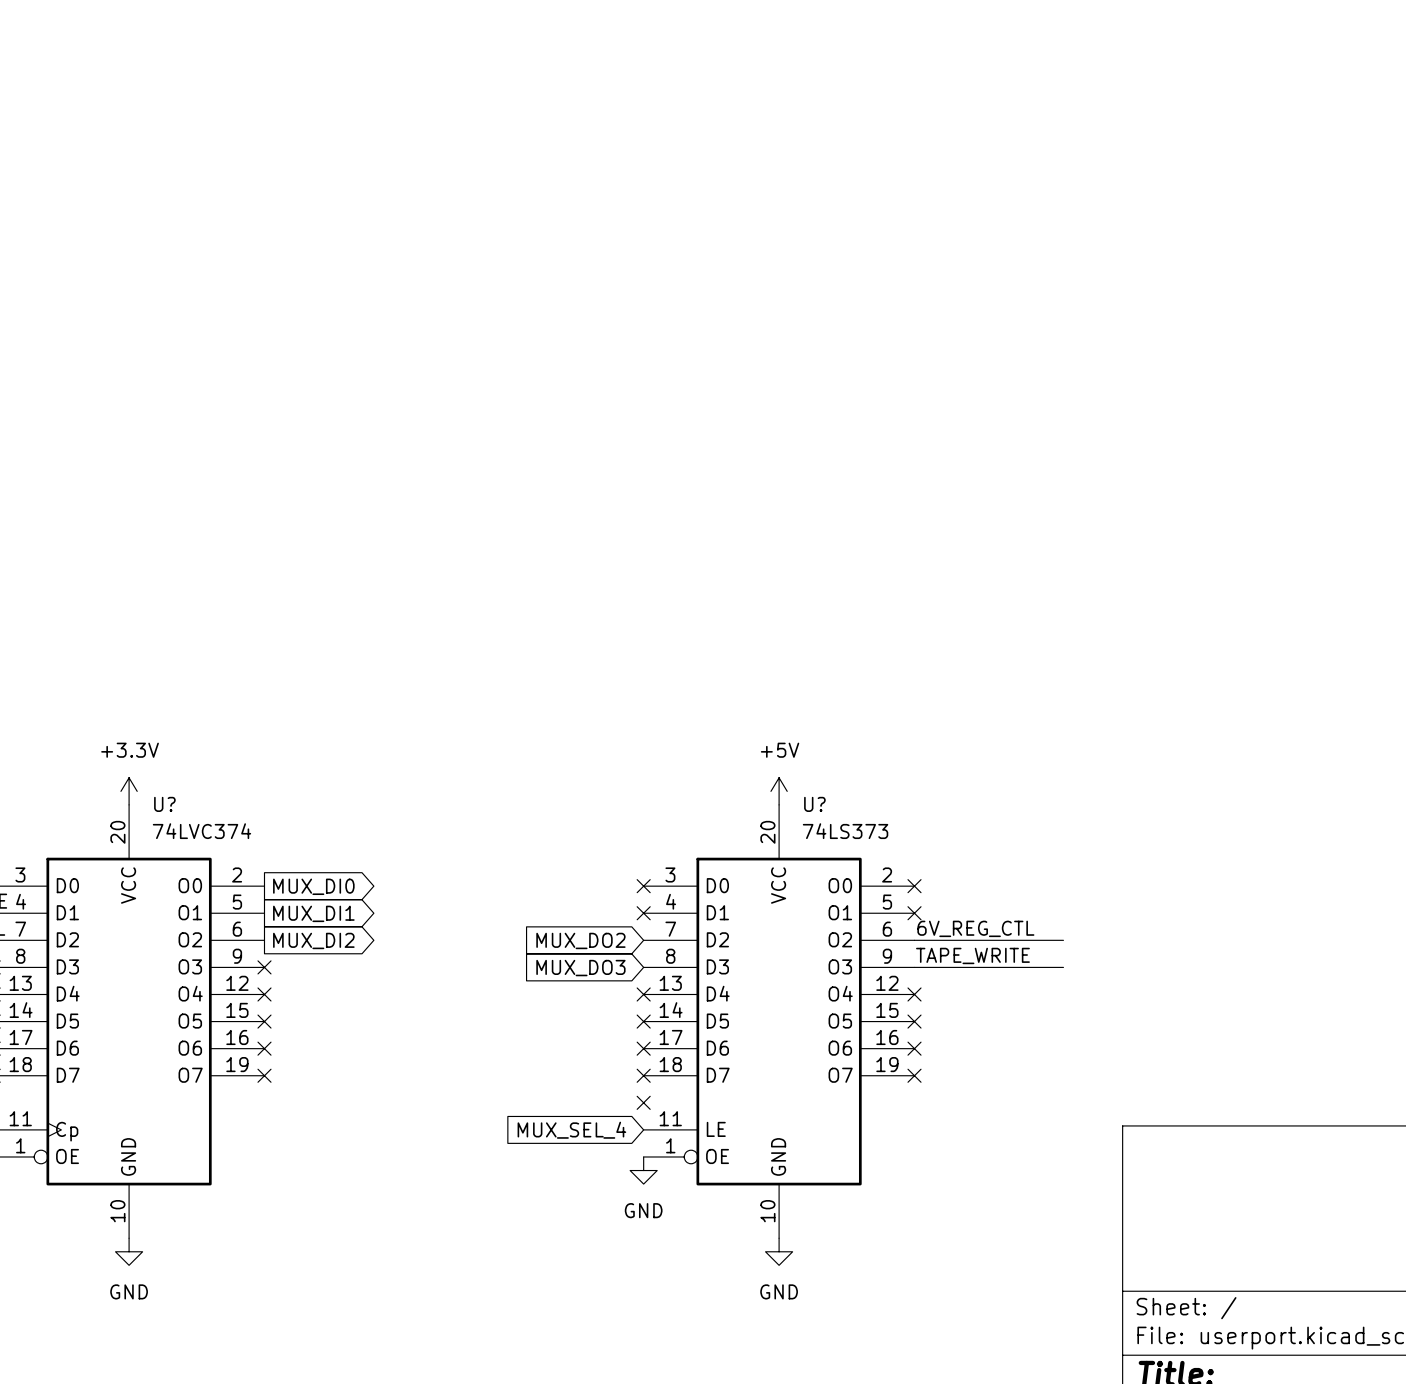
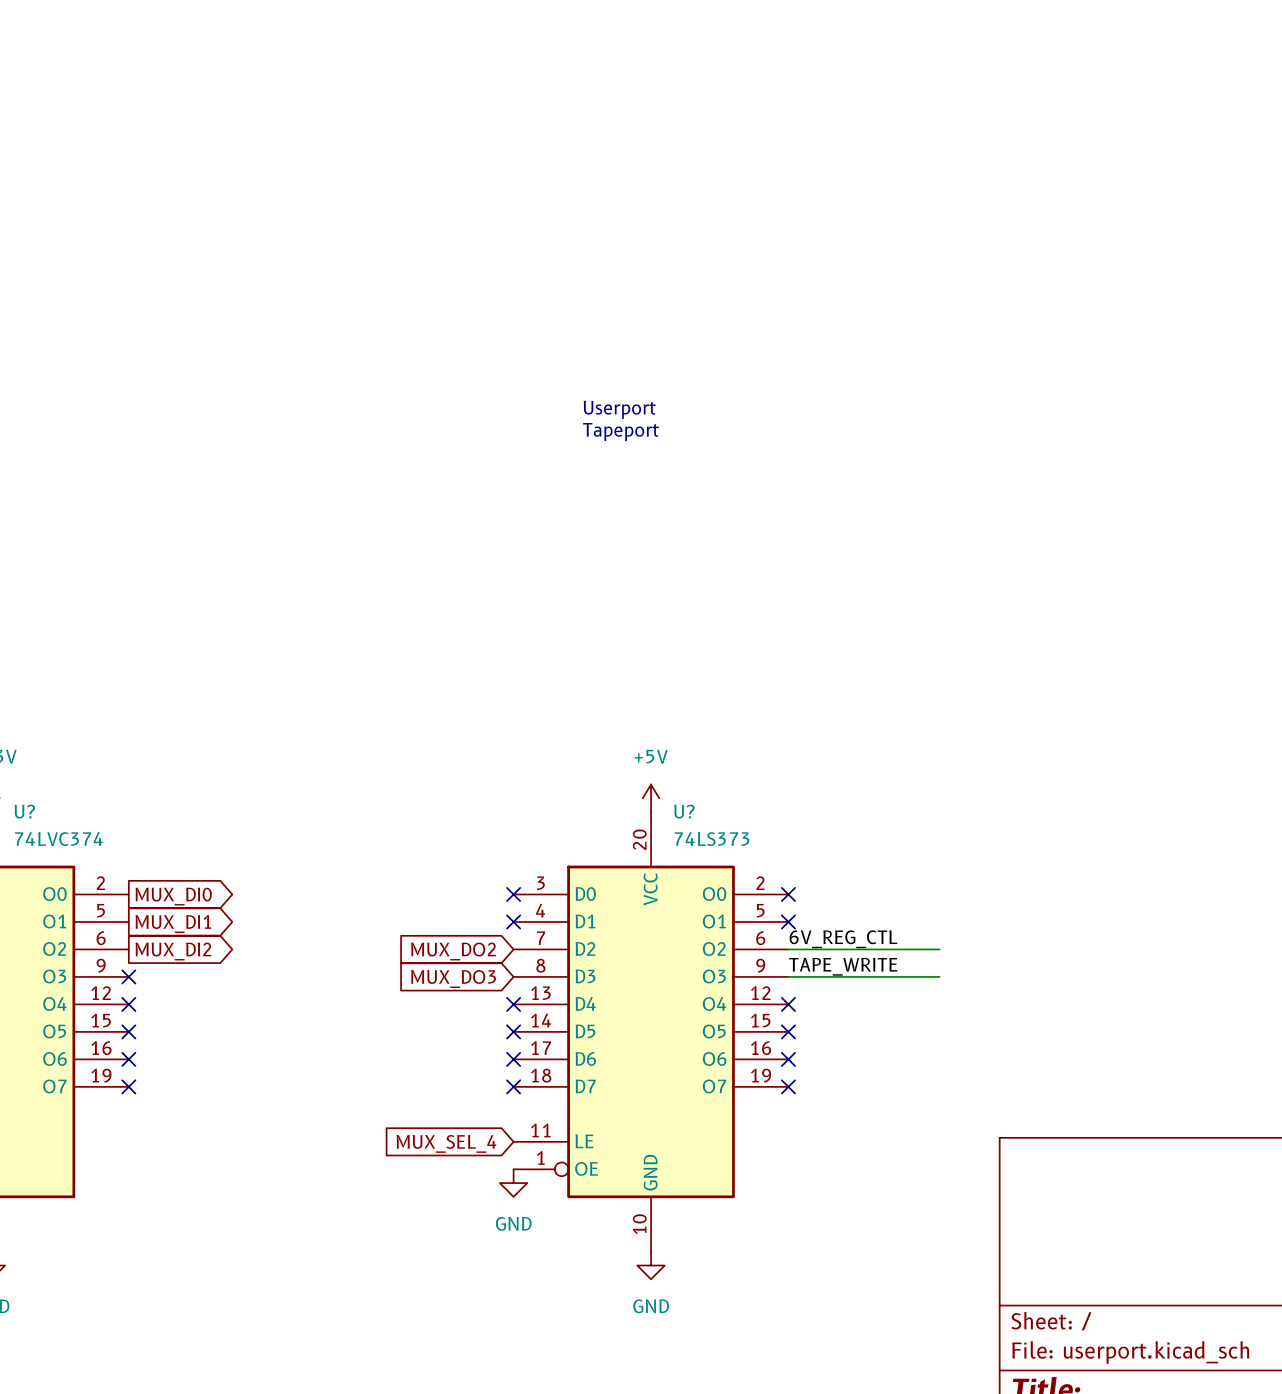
text: none -> Userport (619, 409)
text: none -> Tapeport (620, 432)
no-connect mark: (643, 1102) -> none

